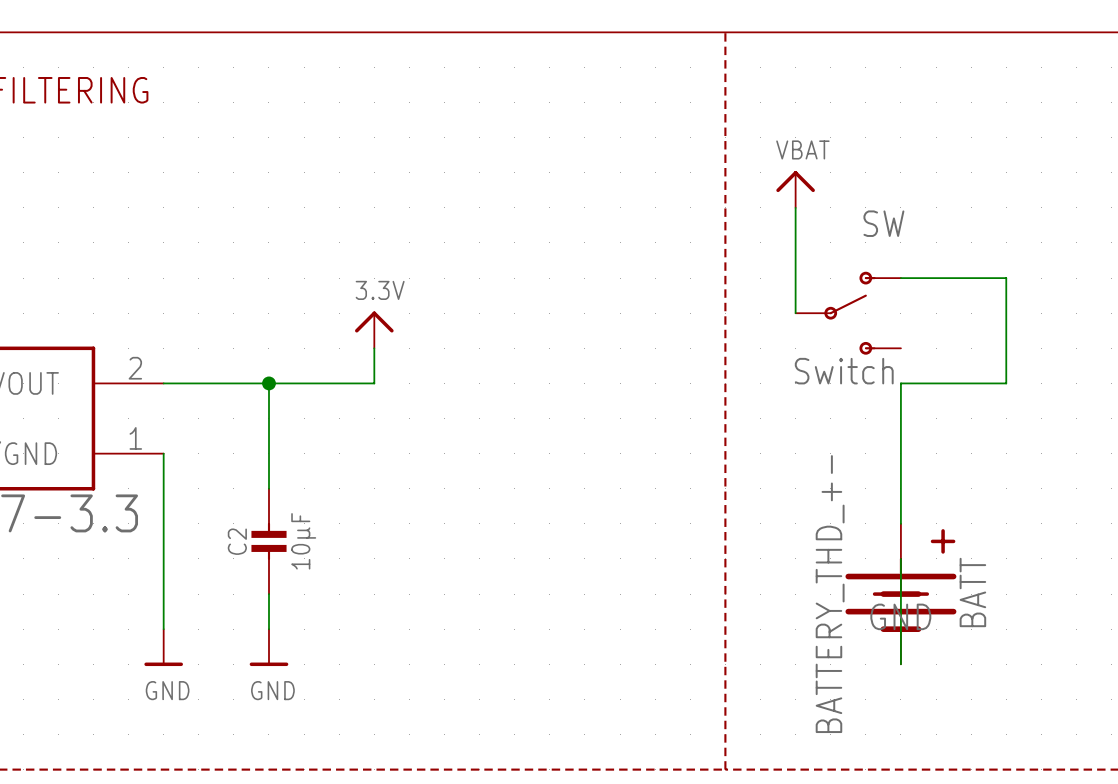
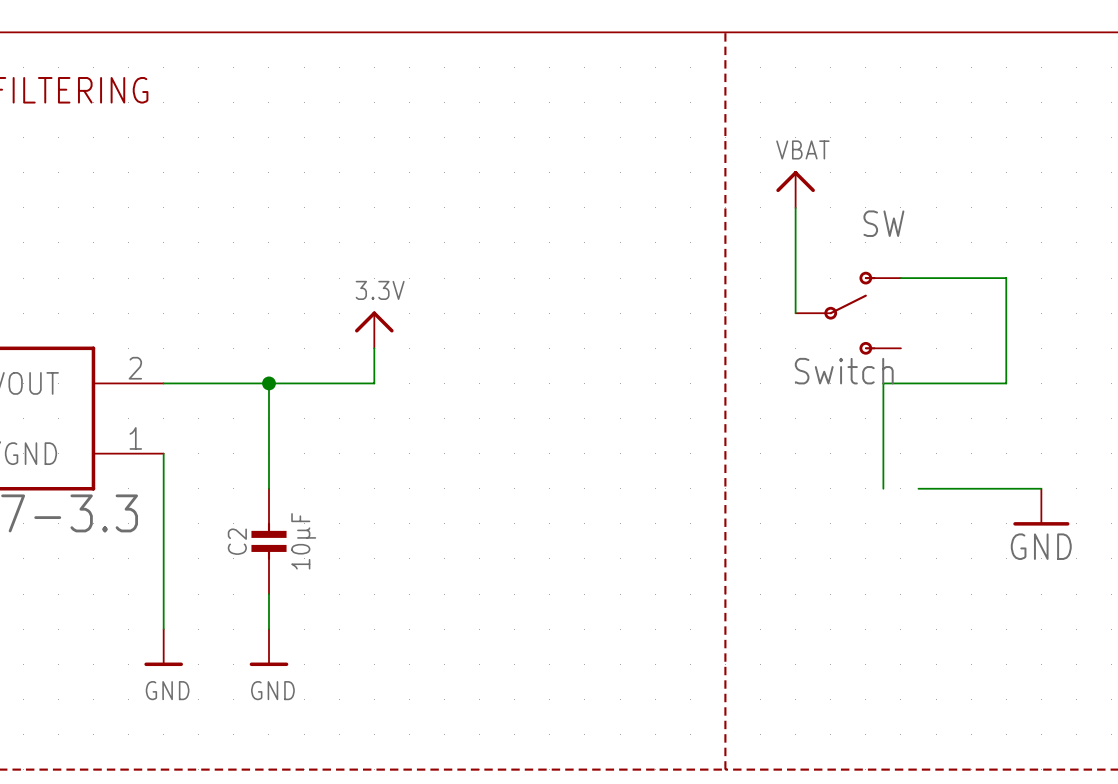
wire: (900, 383) (900, 523) -> (900, 383) (883, 383) (883, 488)
wire: none -> (918, 488) (1041, 488)
wire: (900, 558) (900, 664) -> none
power symbol position: GND (900, 577) -> GND (1041, 507)
BATT: BATTERY_THD_+- (900, 594) -> none

